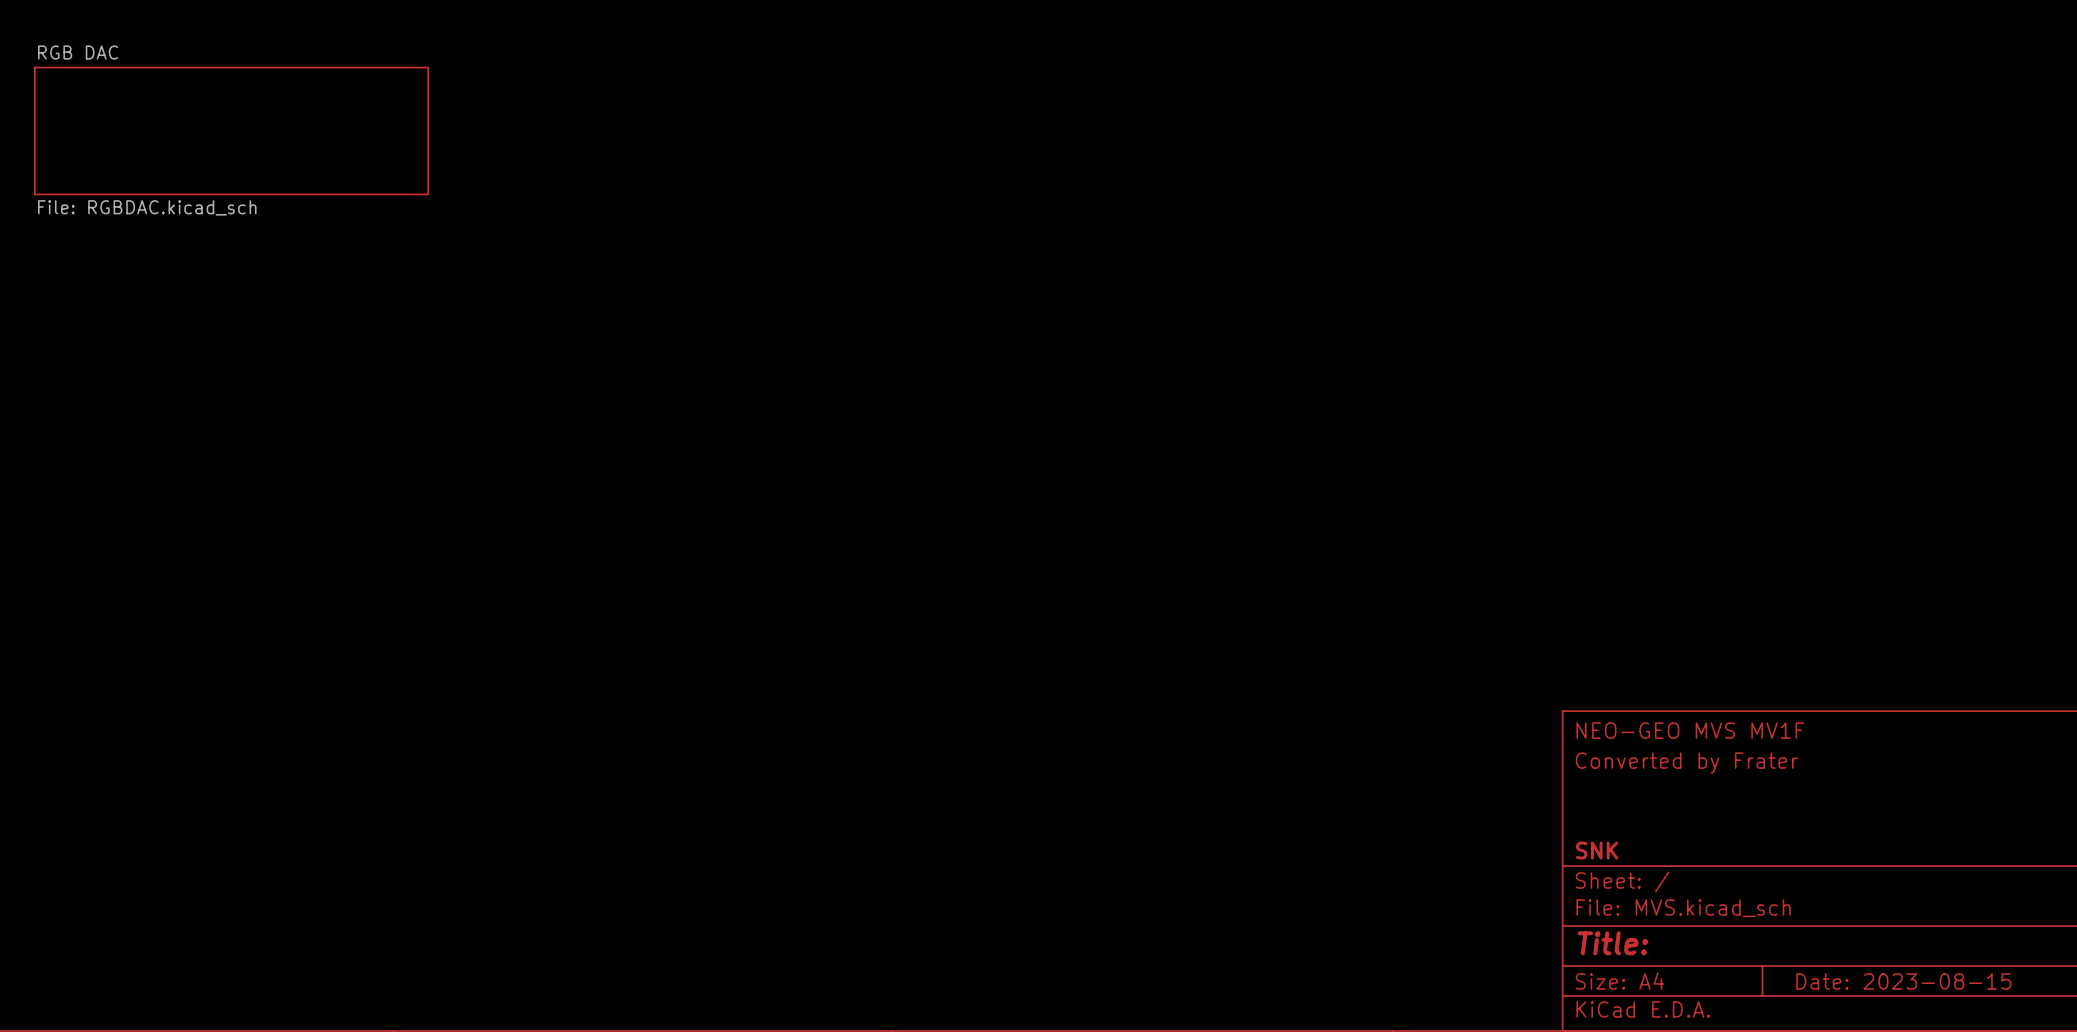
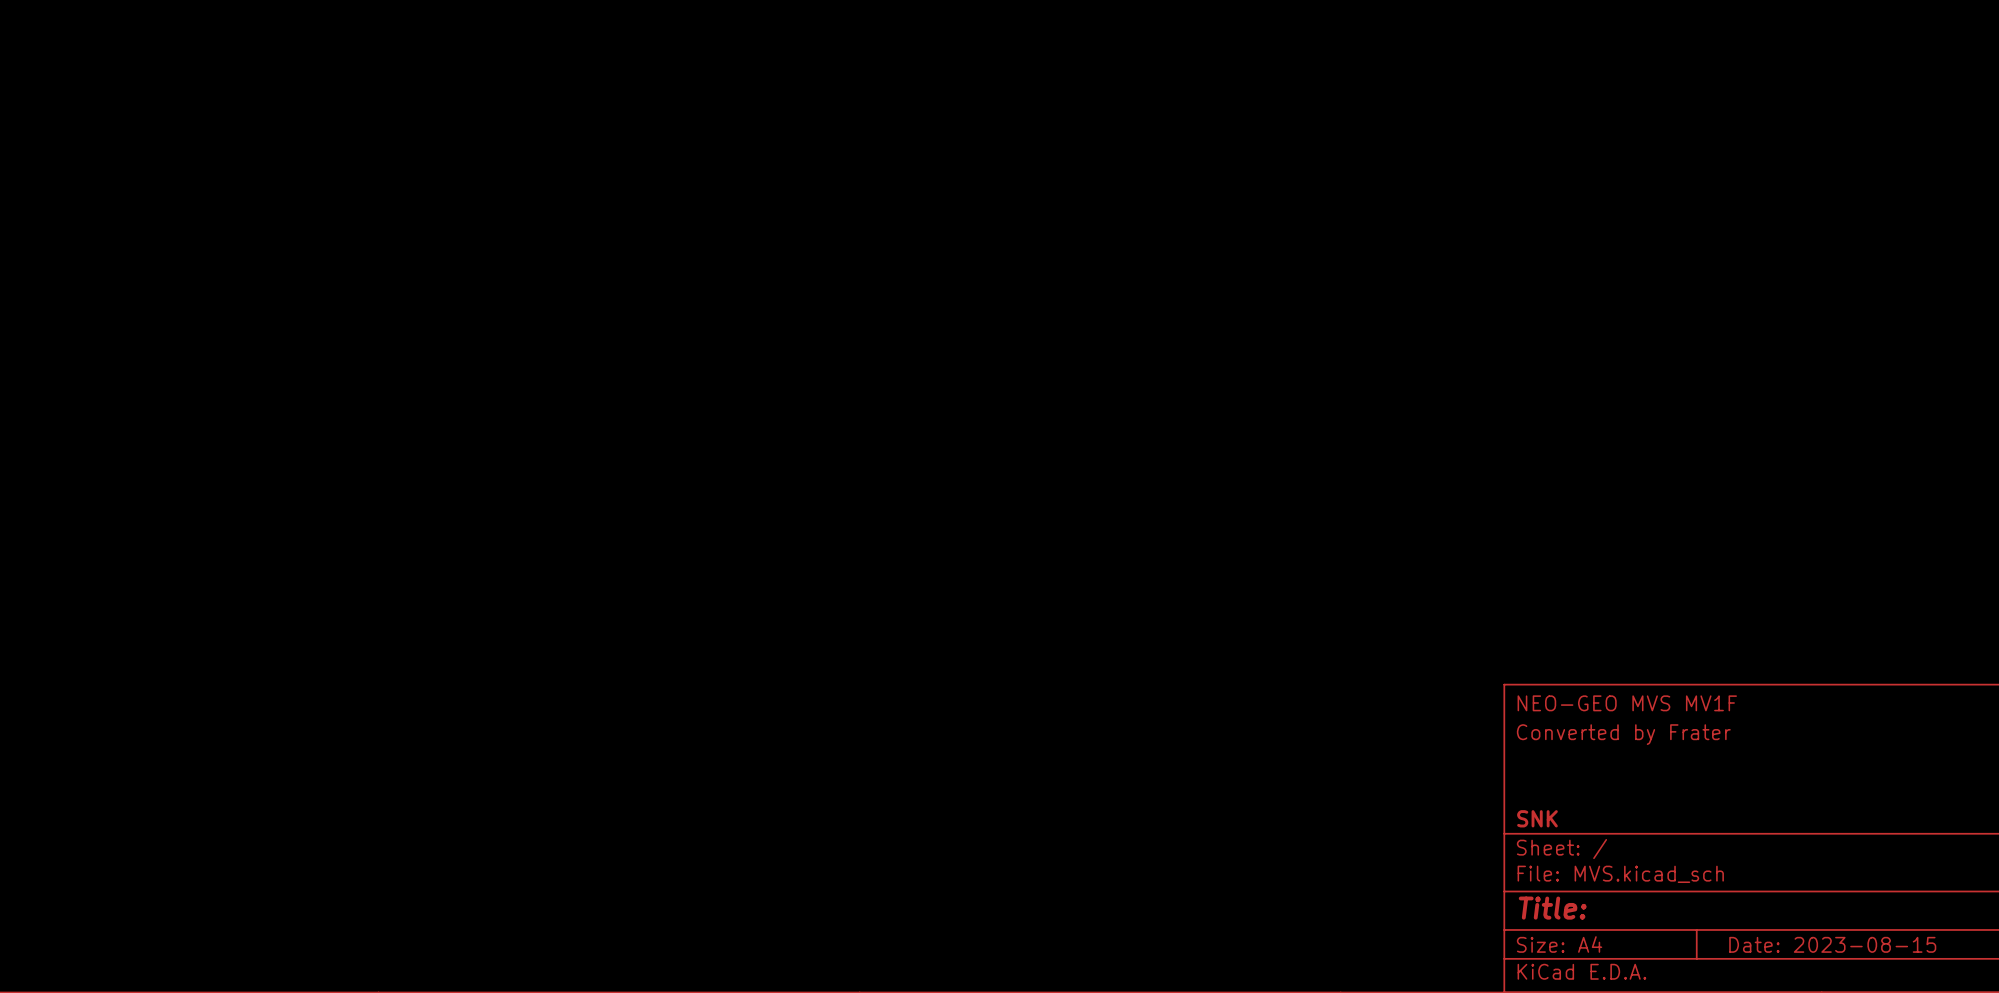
sheet RGB DAC: File: RGBDAC.kicad_sch (231, 131) -> none

